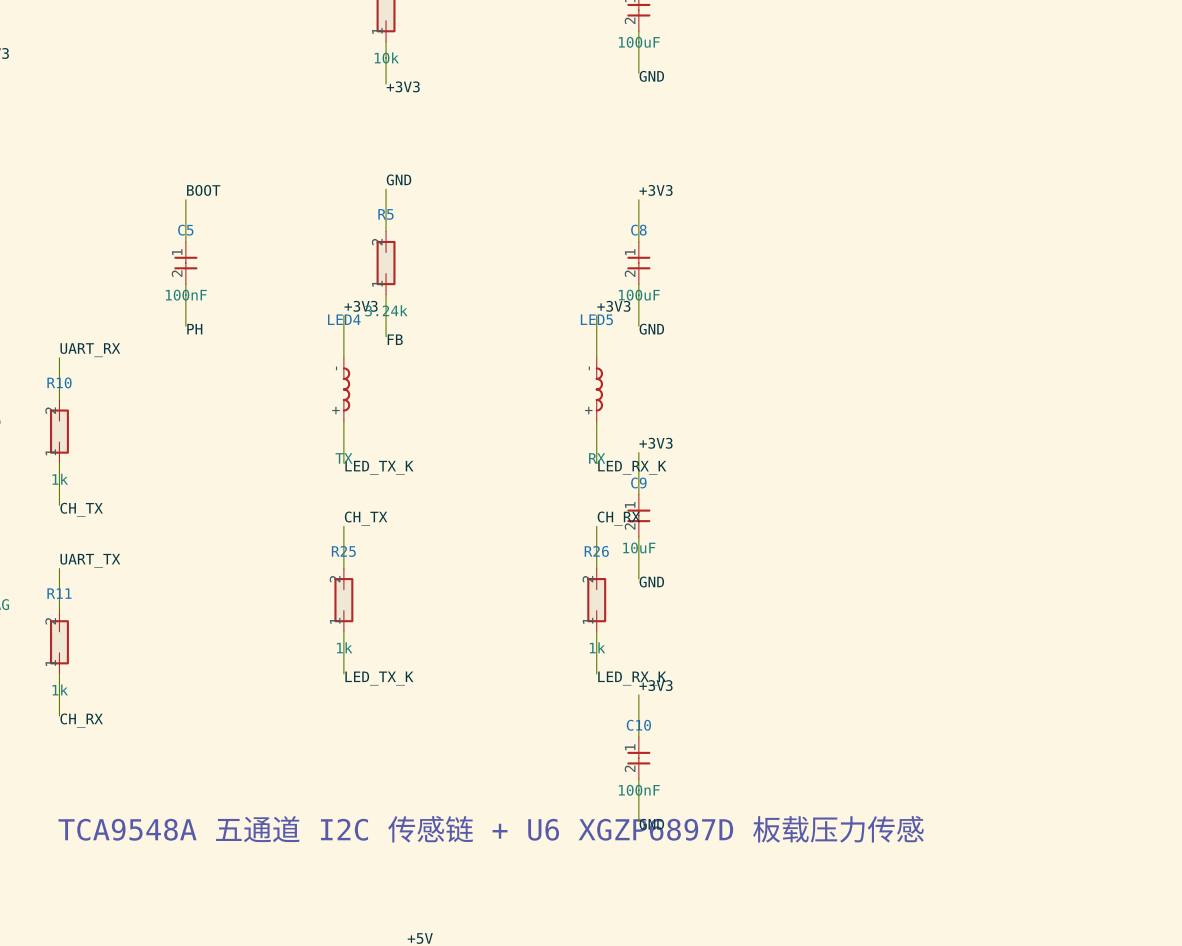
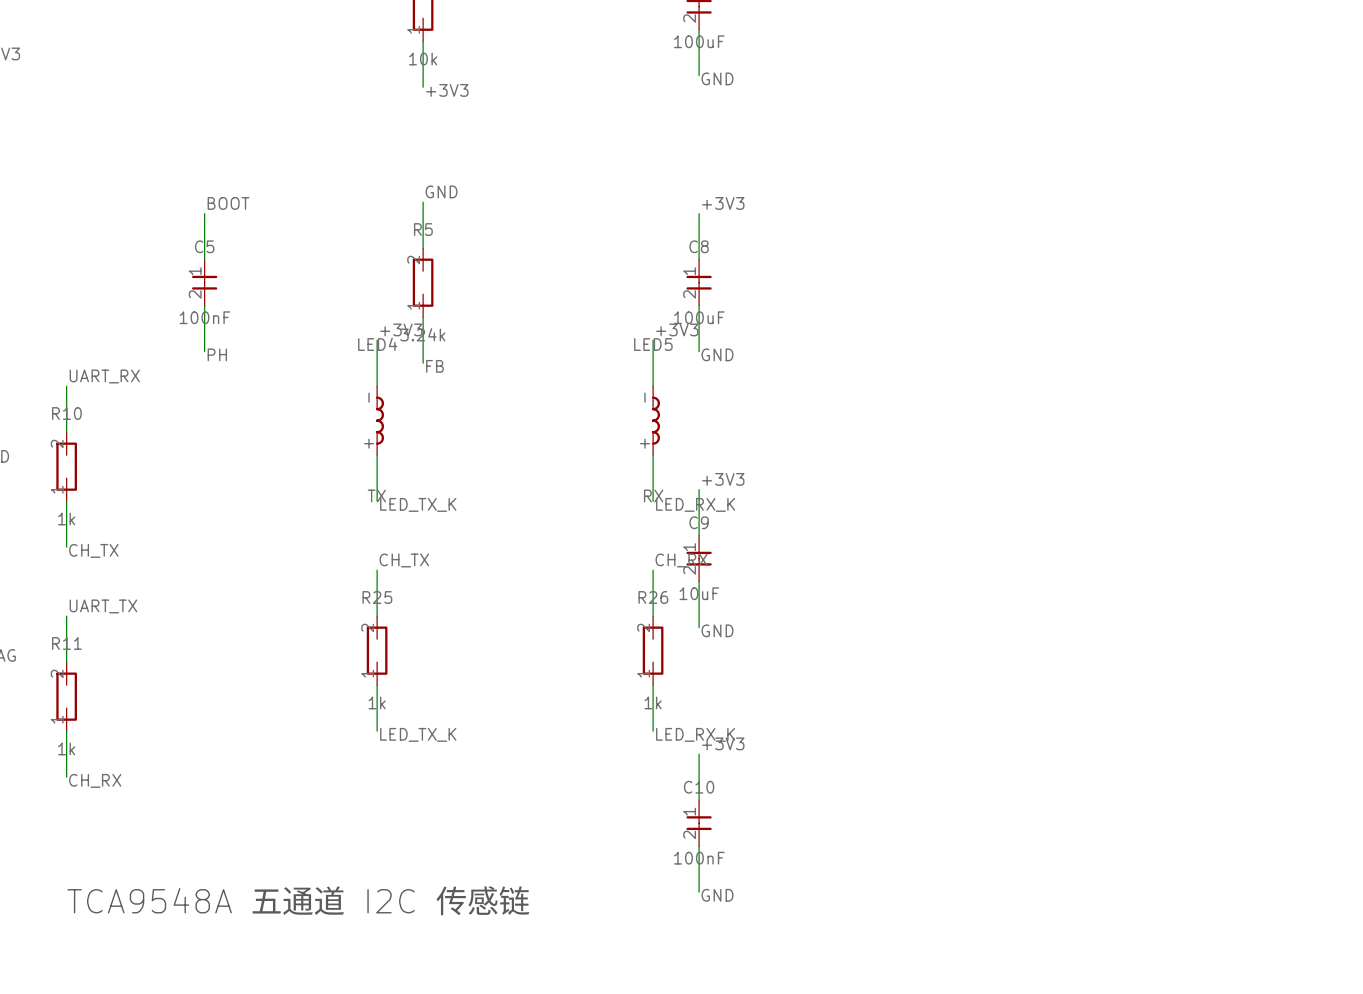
text: TCA9548A 五通道 I2C 传感链 + U6 XGZP6897D 板载压力传感 (491, 829) -> TCA9548A 五通道 I2C 传感链 (298, 900)

